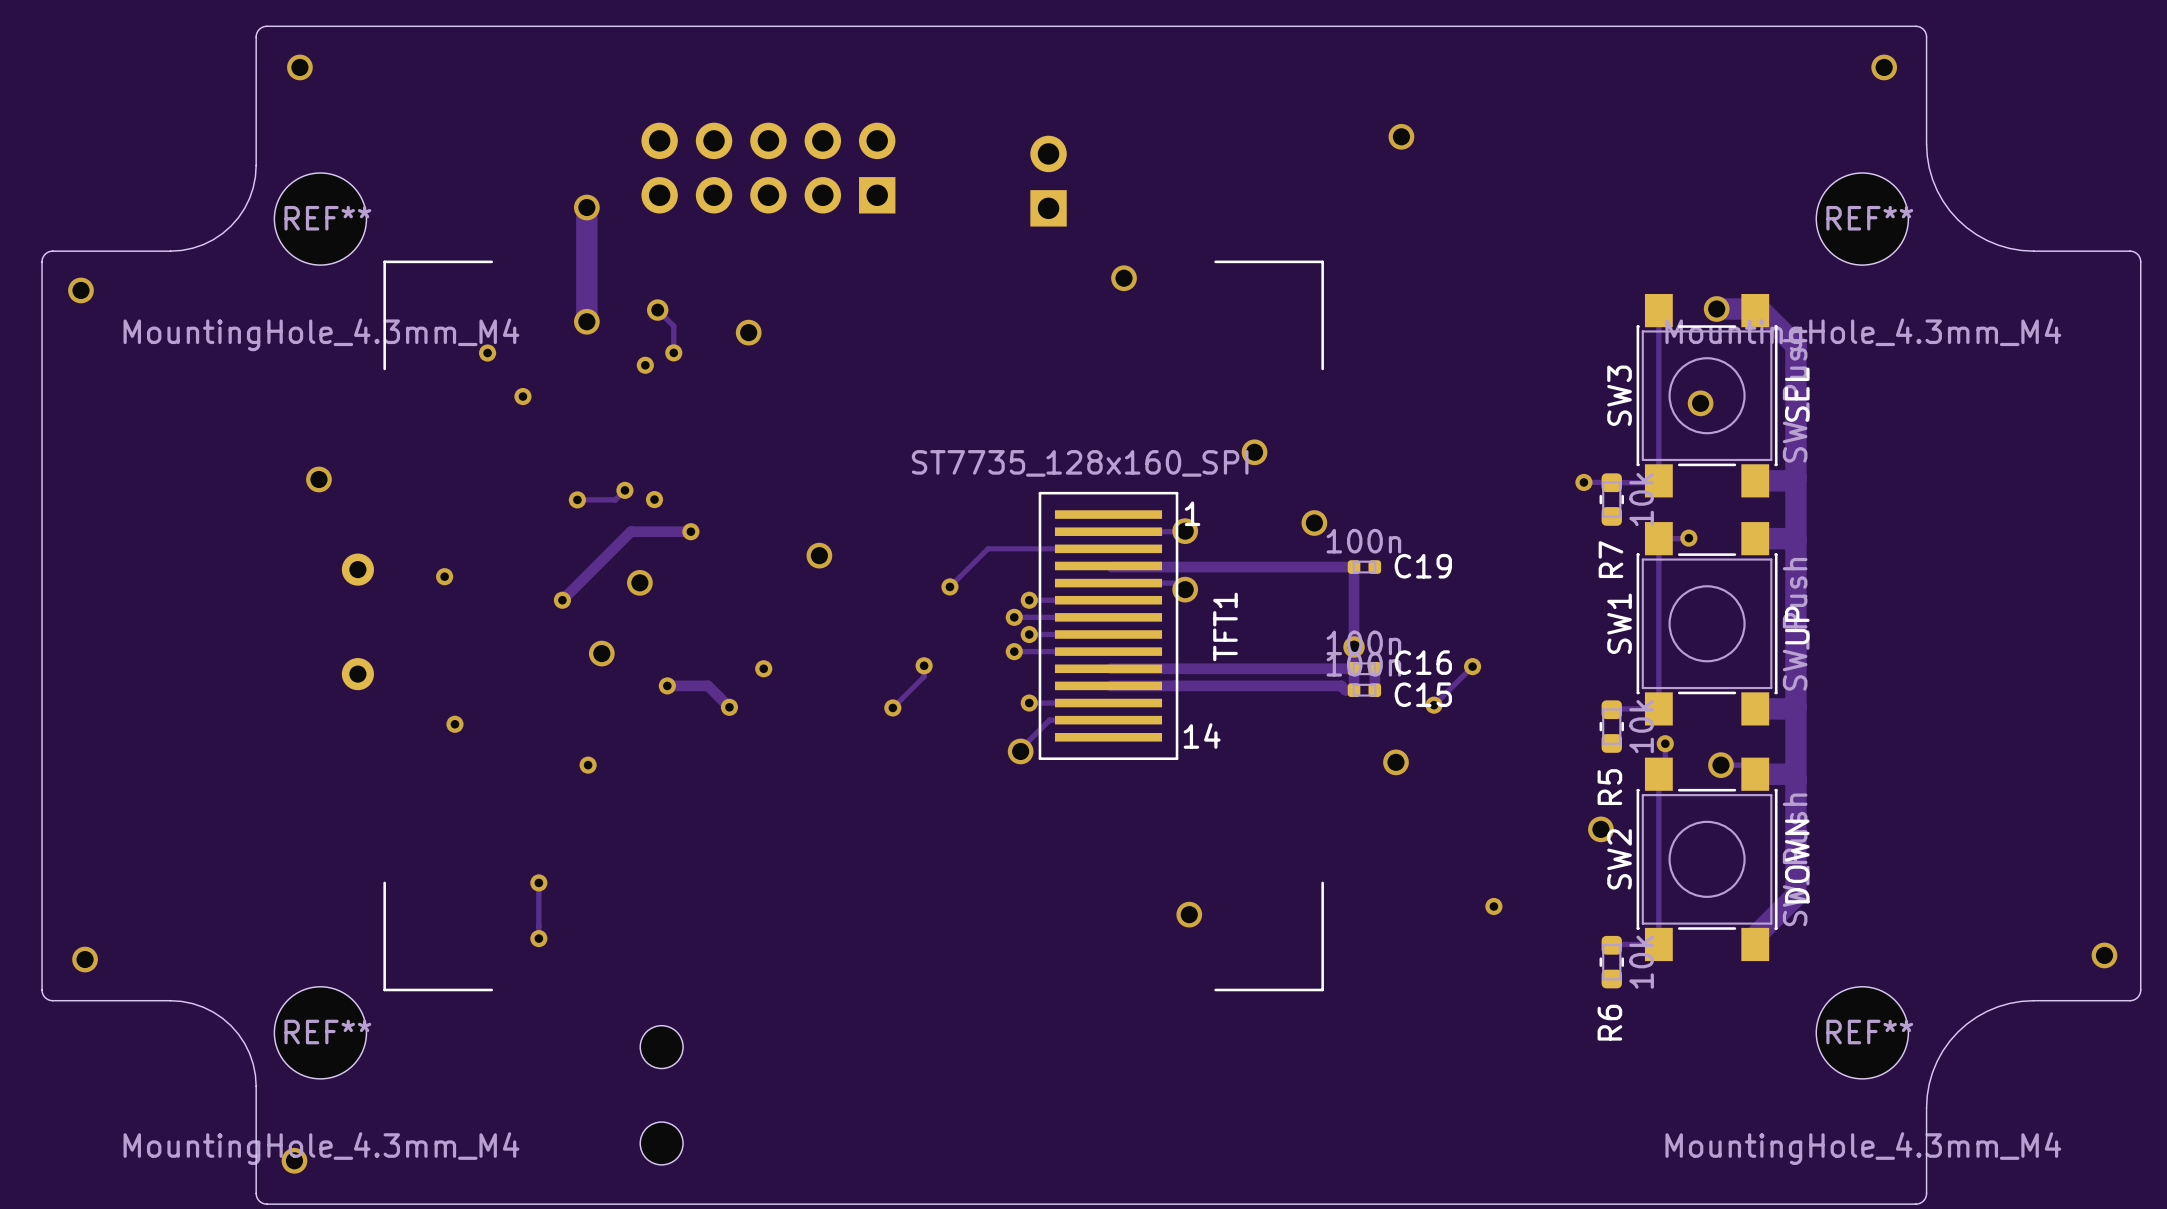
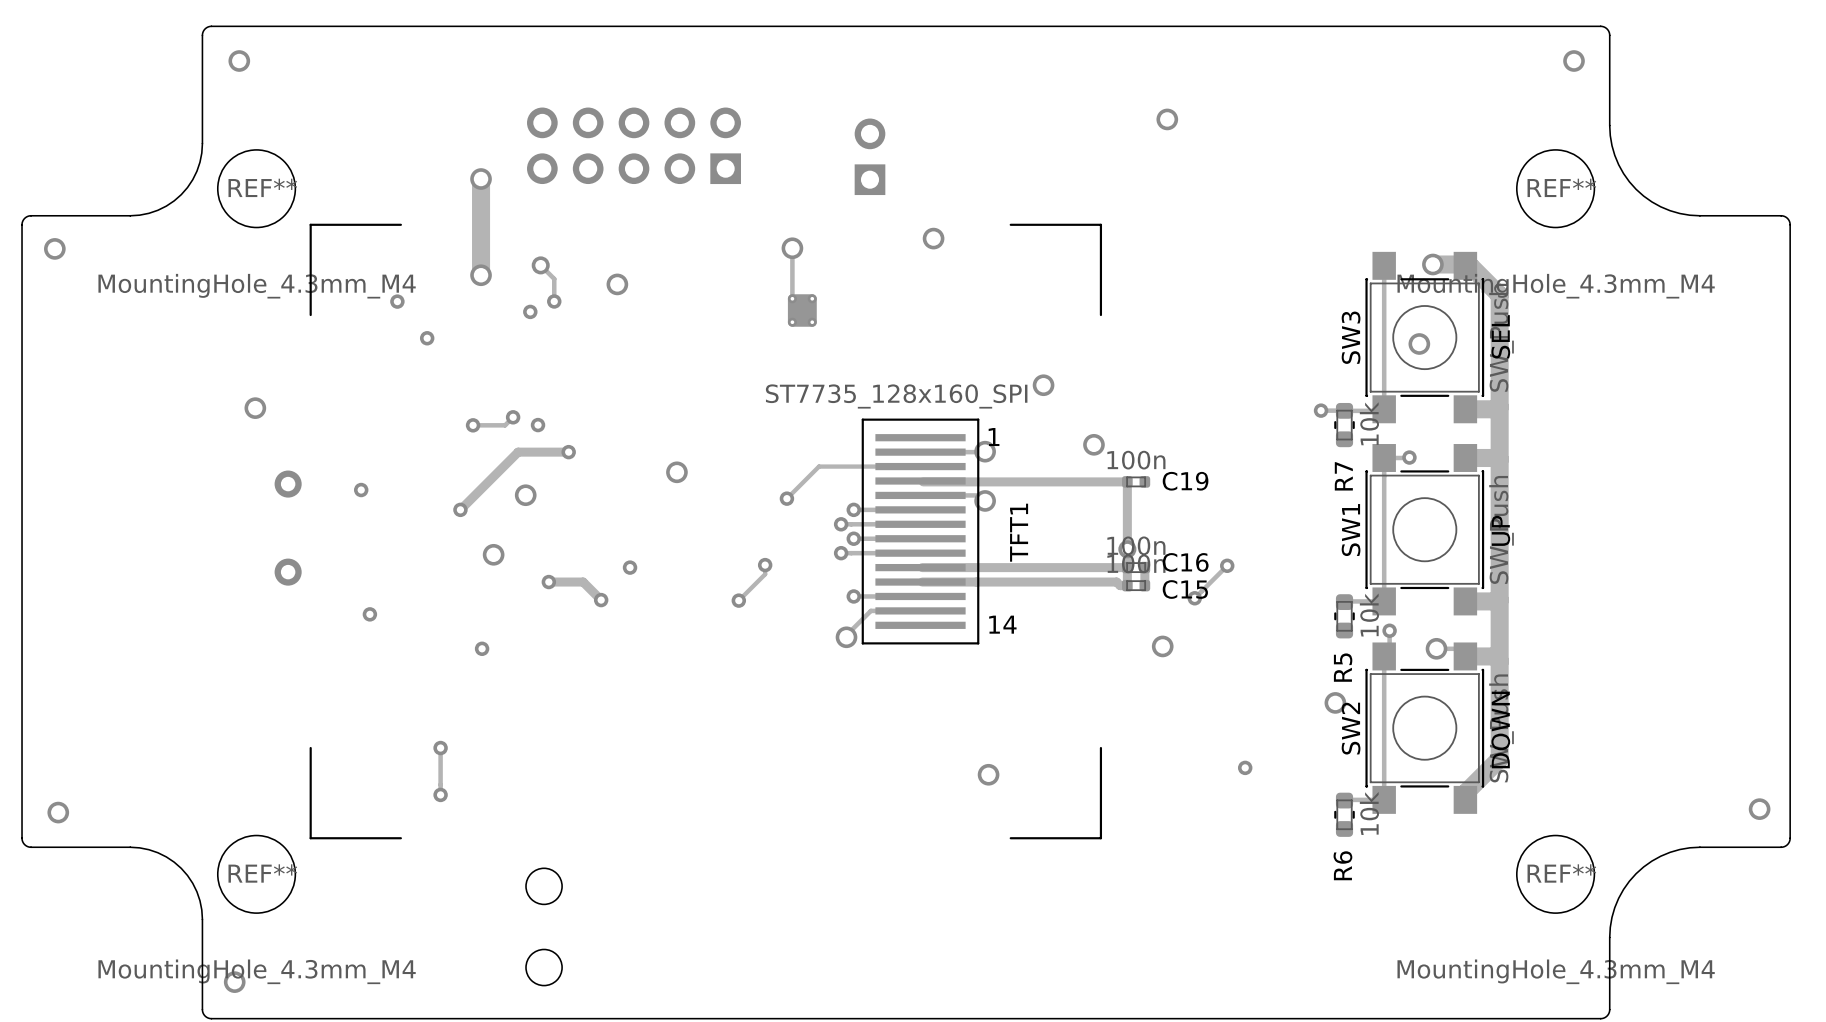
track: none -> (792, 248) (792, 300) (802, 310)
via: none -> (792, 248)
part: none -> (802, 310)

